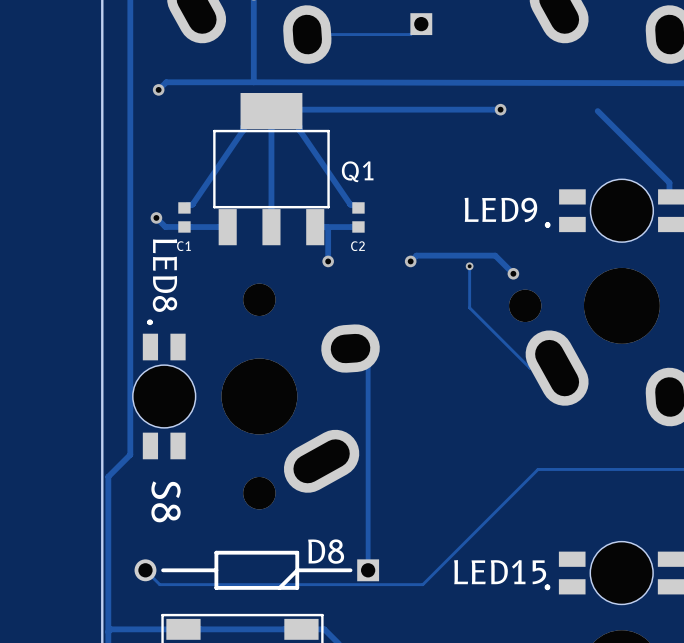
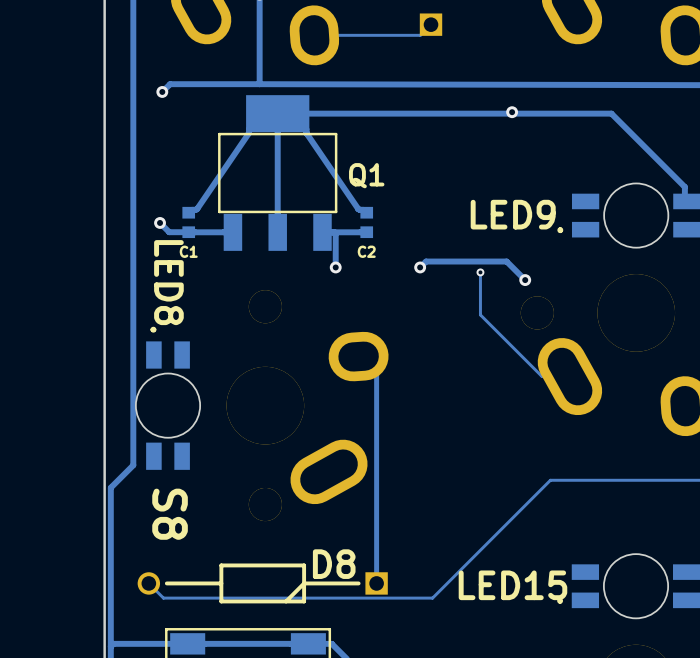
track: (500, 109) (271, 111) -> (611, 113) (277, 113)

